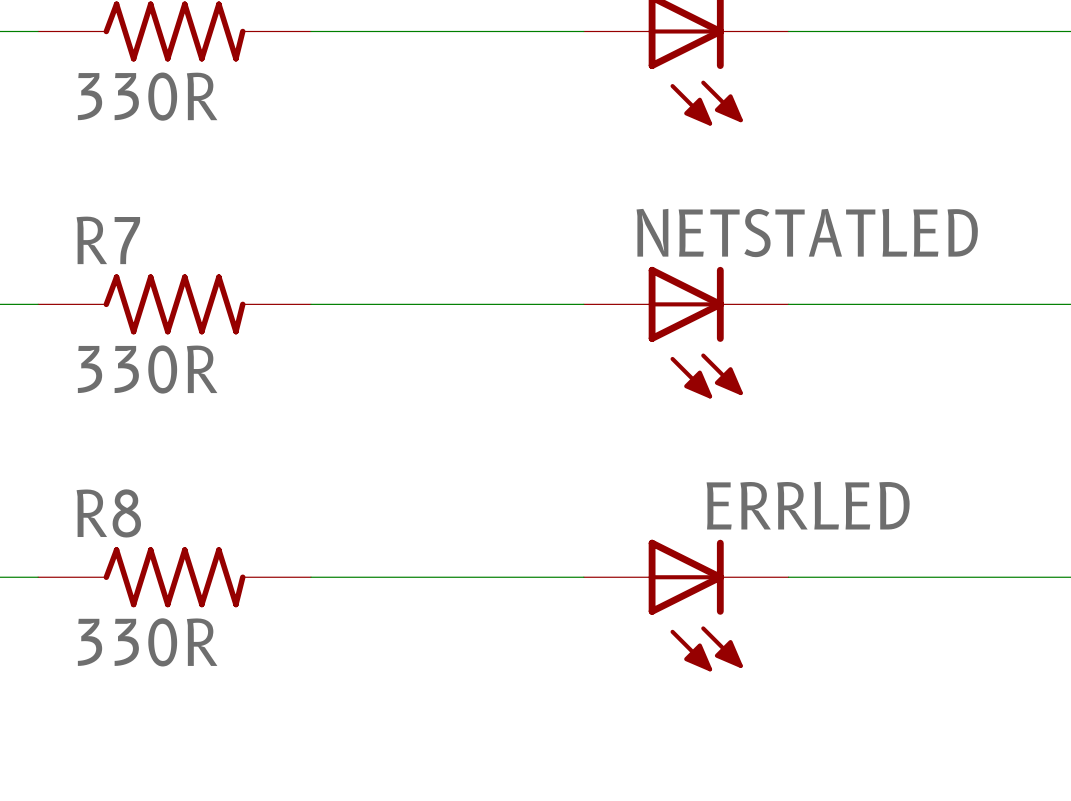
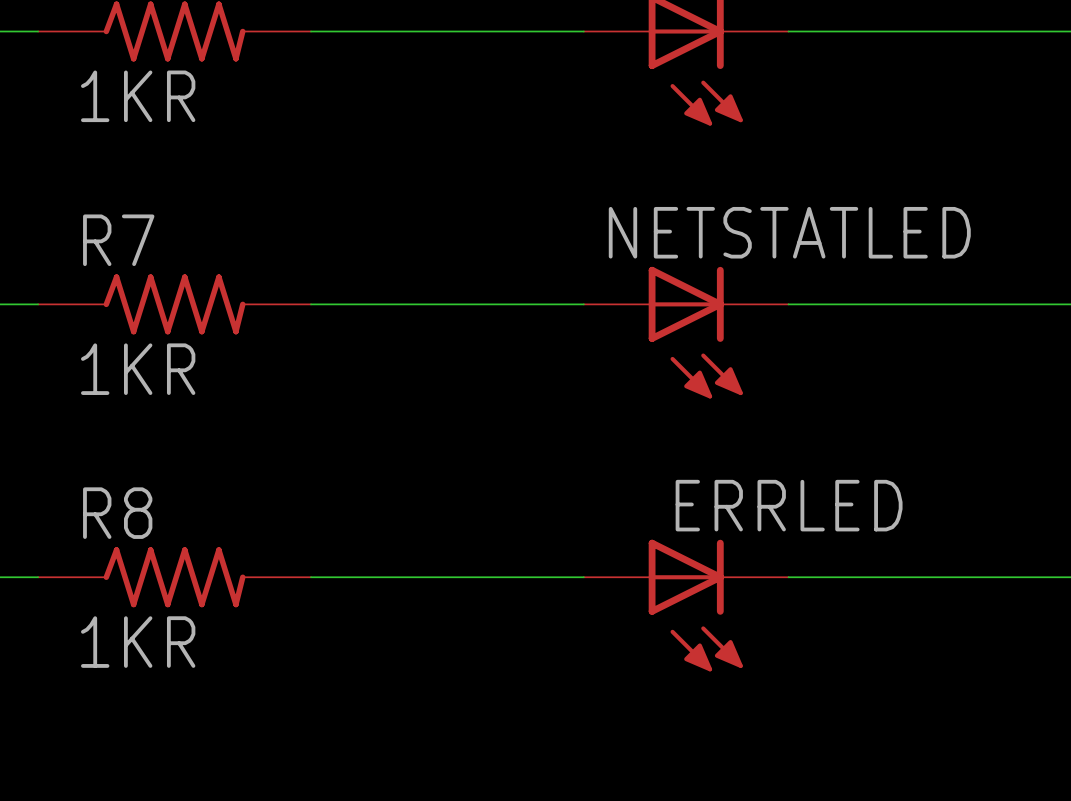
part value: 330R (147, 96) -> 1KR (138, 96)
R7 value: 330R (147, 369) -> 1KR (138, 369)
R8 value: 330R (147, 642) -> 1KR (138, 642)

